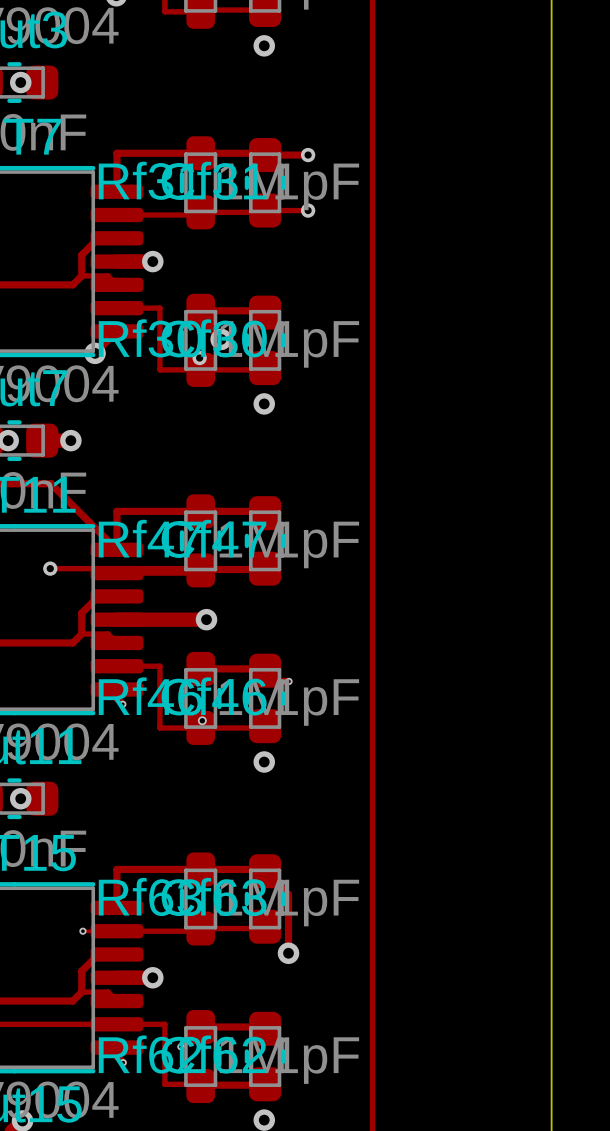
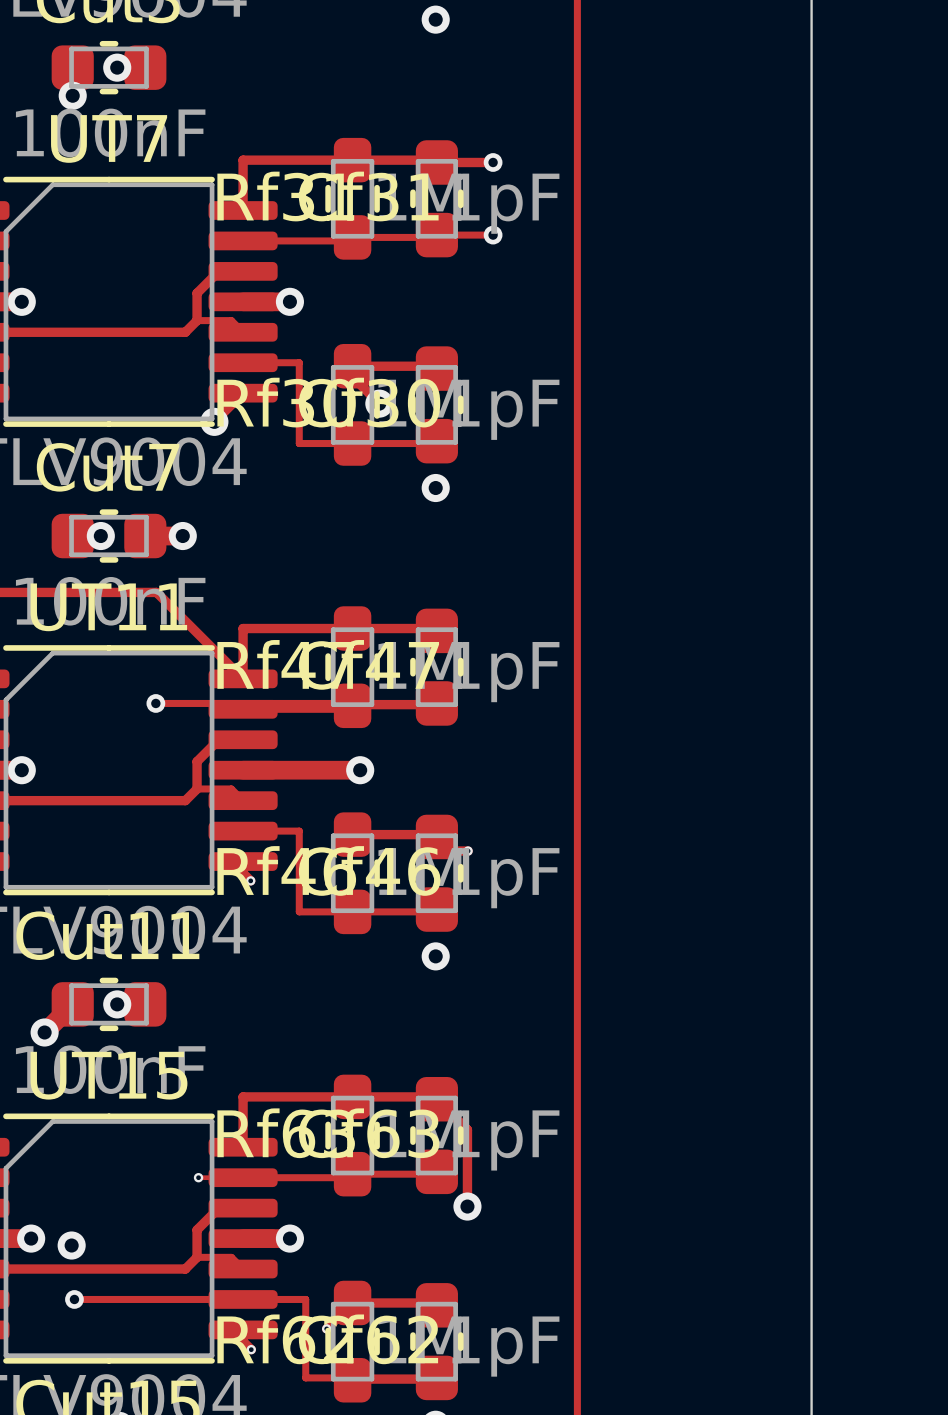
via: (199, 358) -> none
via: (202, 720) -> none

